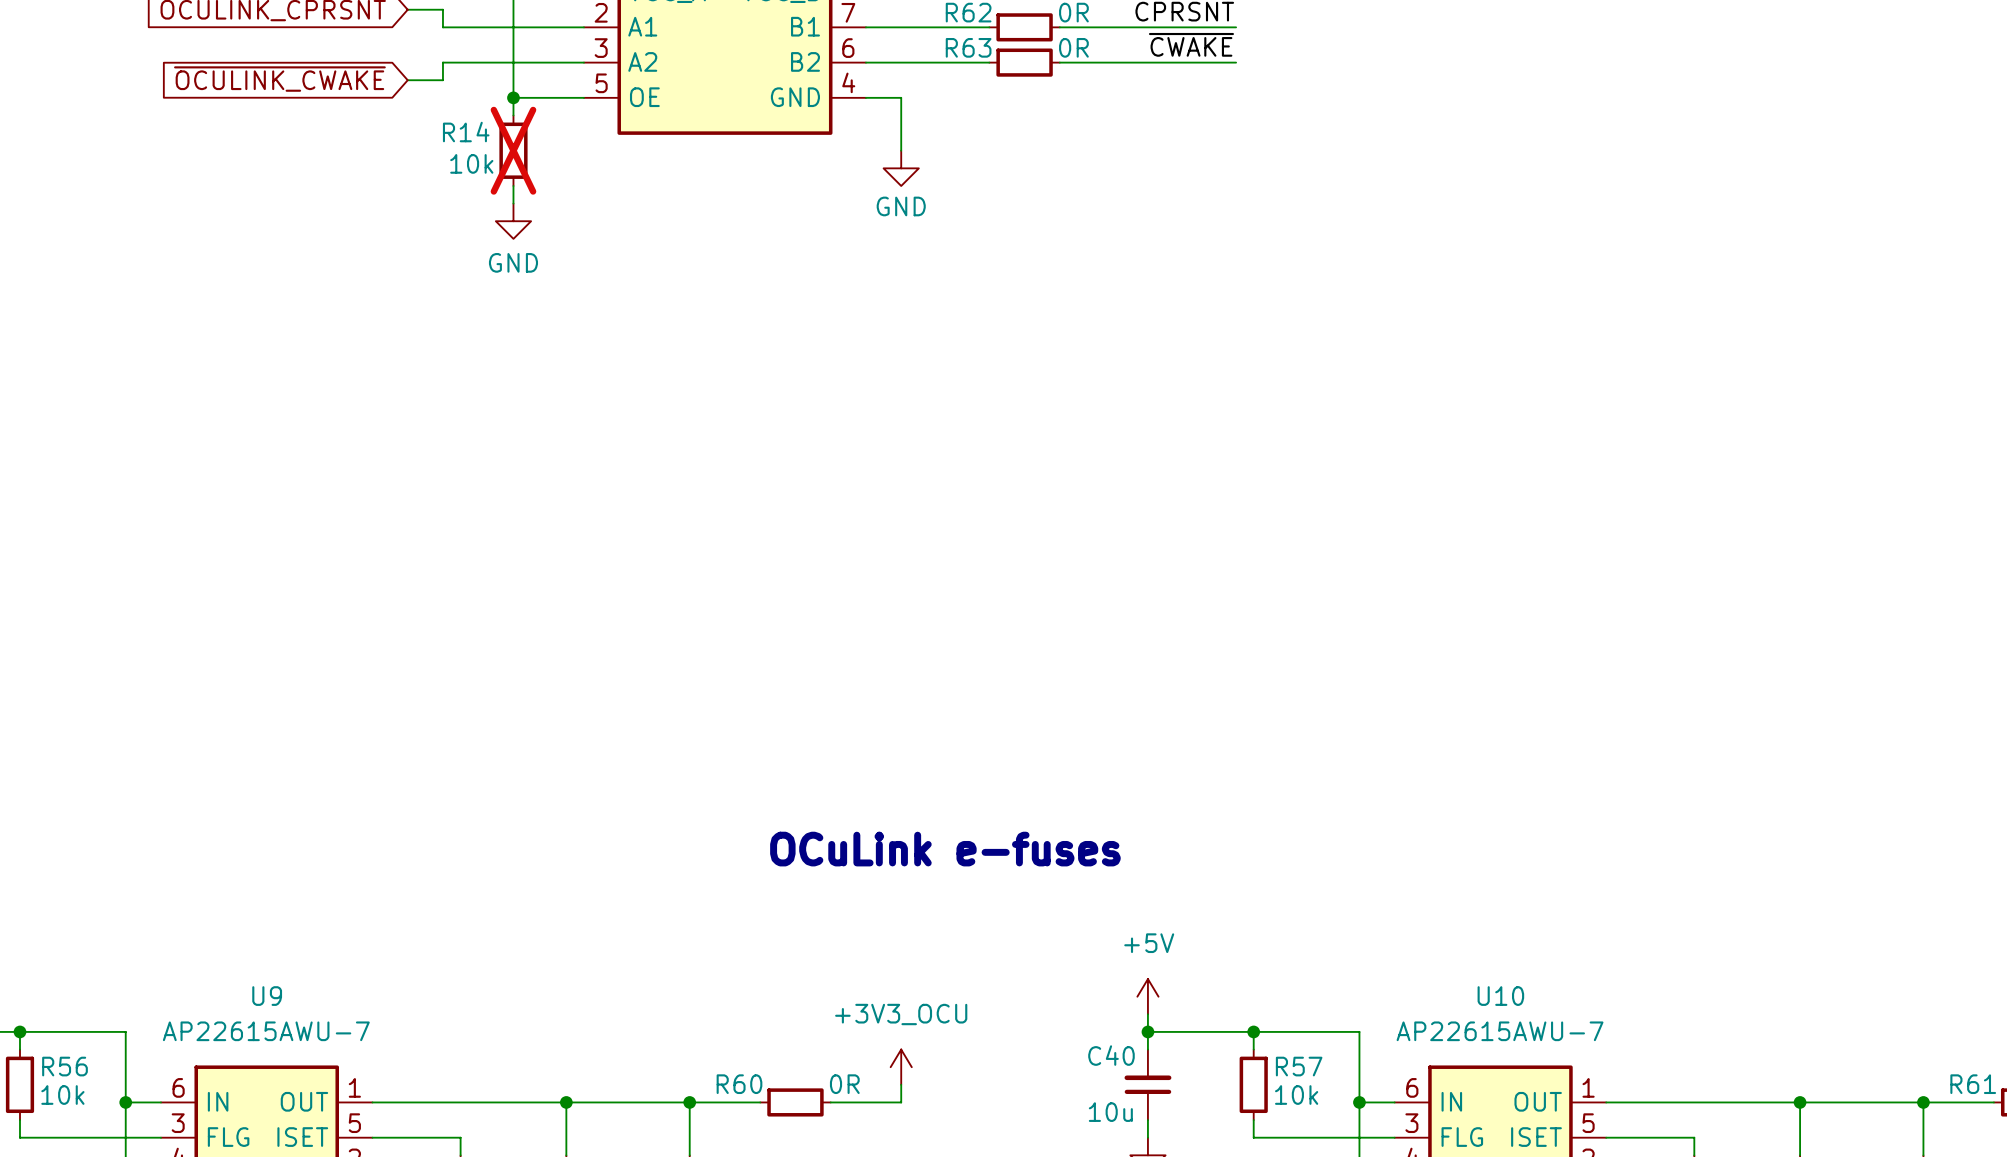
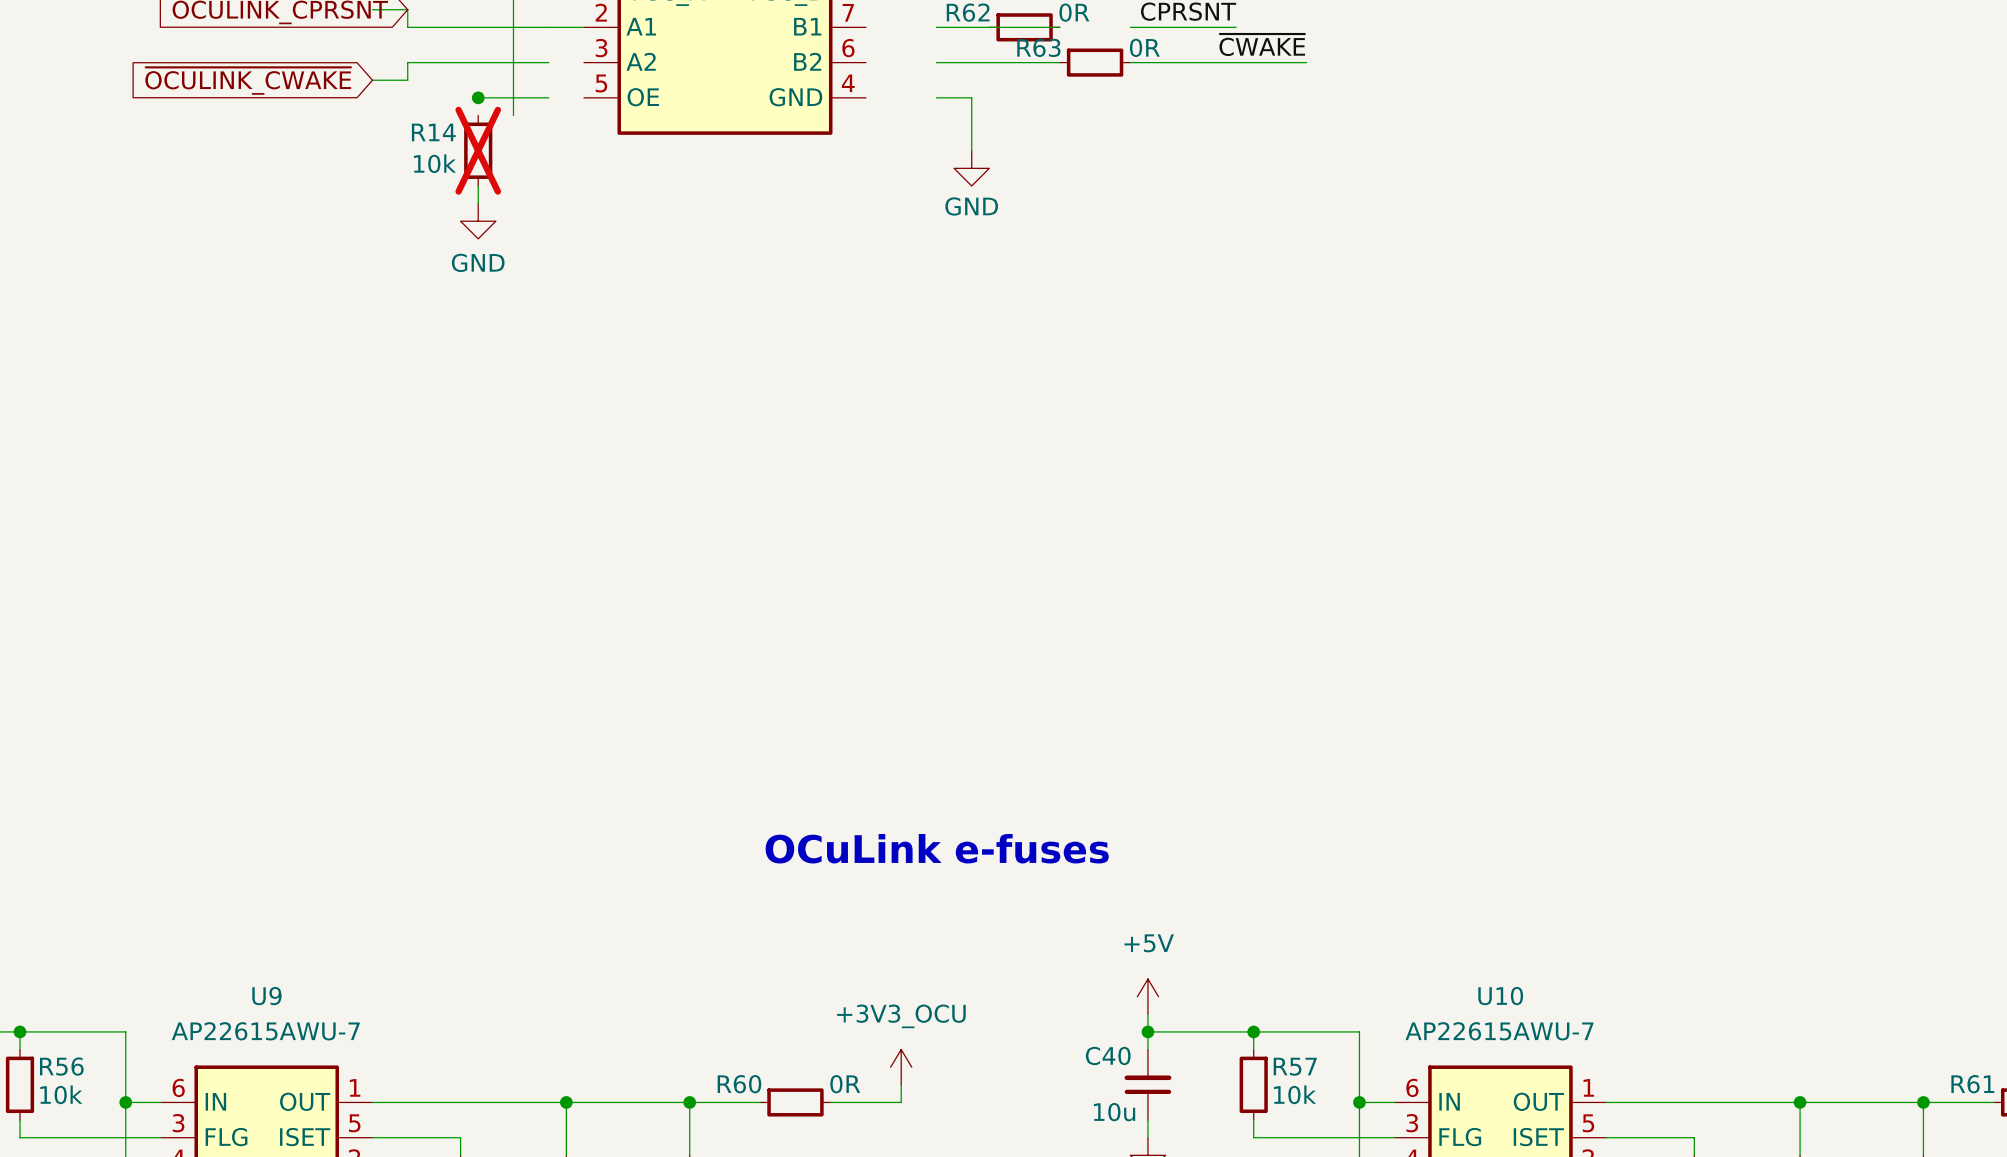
wire: (407, 9) (442, 9) (442, 27) -> (372, 9) (407, 9) (407, 27) (442, 27)
wire: (865, 27) (936, 27) -> none
wire: (1059, 27) (1130, 27) -> (1059, 27) (989, 27)
label position: ~{CWAKE} (1191, 44) -> ~{CWAKE} (1262, 45)
wire: (442, 62) (442, 80) (407, 80) -> (442, 62) (407, 62) (407, 80) (372, 80)
wire: (548, 62) (583, 62) -> none
wire: (865, 62) (936, 62) -> none
R63 position: (1024, 62) -> (1095, 62)
wire: (1059, 62) (1130, 62) -> (1059, 62) (989, 62)
wire: none -> (1236, 62) (1306, 62)
global label position: ~{OCULINK_CWAKE} (279, 79) -> ~{OCULINK_CWAKE} (248, 81)
junction position: (513, 97) -> (478, 97)
wire: (548, 97) (583, 97) -> (478, 97) (513, 97)
wire: (865, 97) (901, 97) (901, 150) -> (936, 97) (971, 97) (971, 150)
R14 position: (513, 150) -> (478, 150)
power symbol position: GND (901, 168) -> GND (971, 168)
wire: (513, 185) (513, 203) -> (478, 185) (478, 203)
power symbol position: GND (513, 221) -> GND (478, 221)

